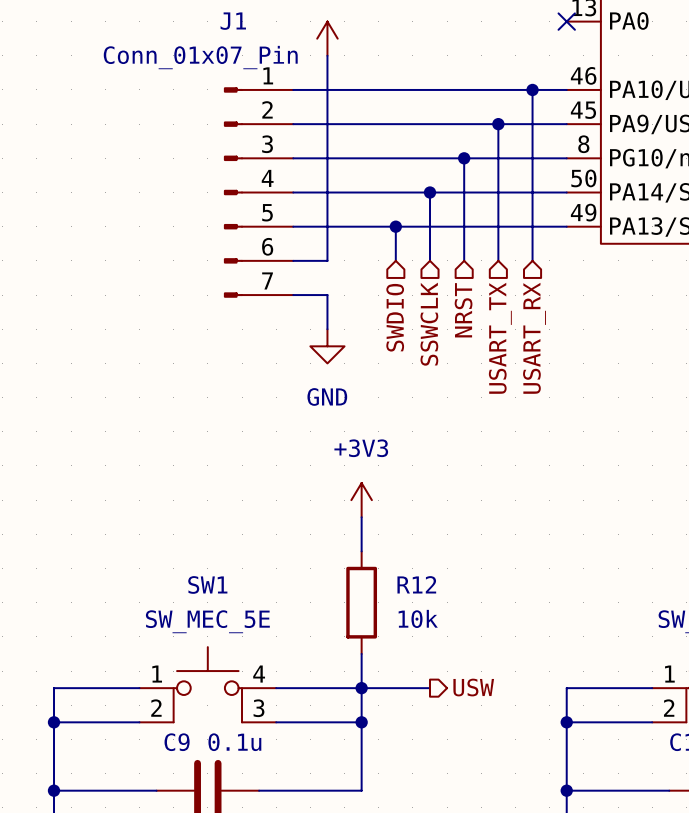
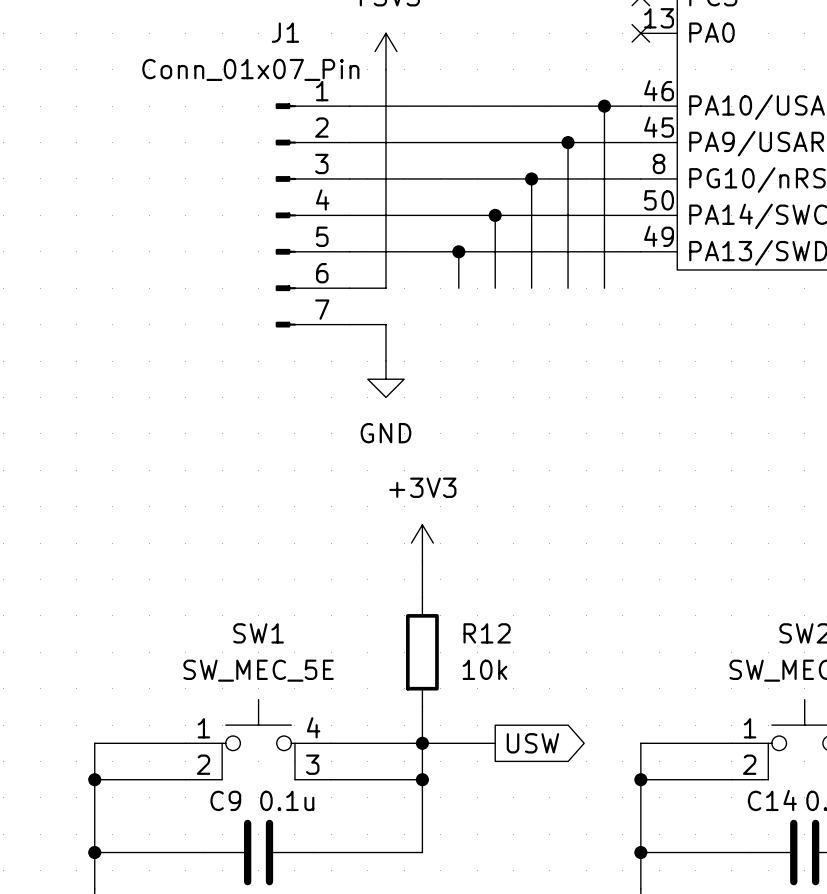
hierarchical label: NRST (463, 310) -> none
hierarchical label: SWDIO (395, 317) -> none
hierarchical label: SSWCLK (429, 324) -> none
hierarchical label: USART_TX (500, 338) -> none
hierarchical label: USART_RX (534, 338) -> none
hierarchical label: USW (473, 687) -> none
global label: none -> USW (532, 743)

